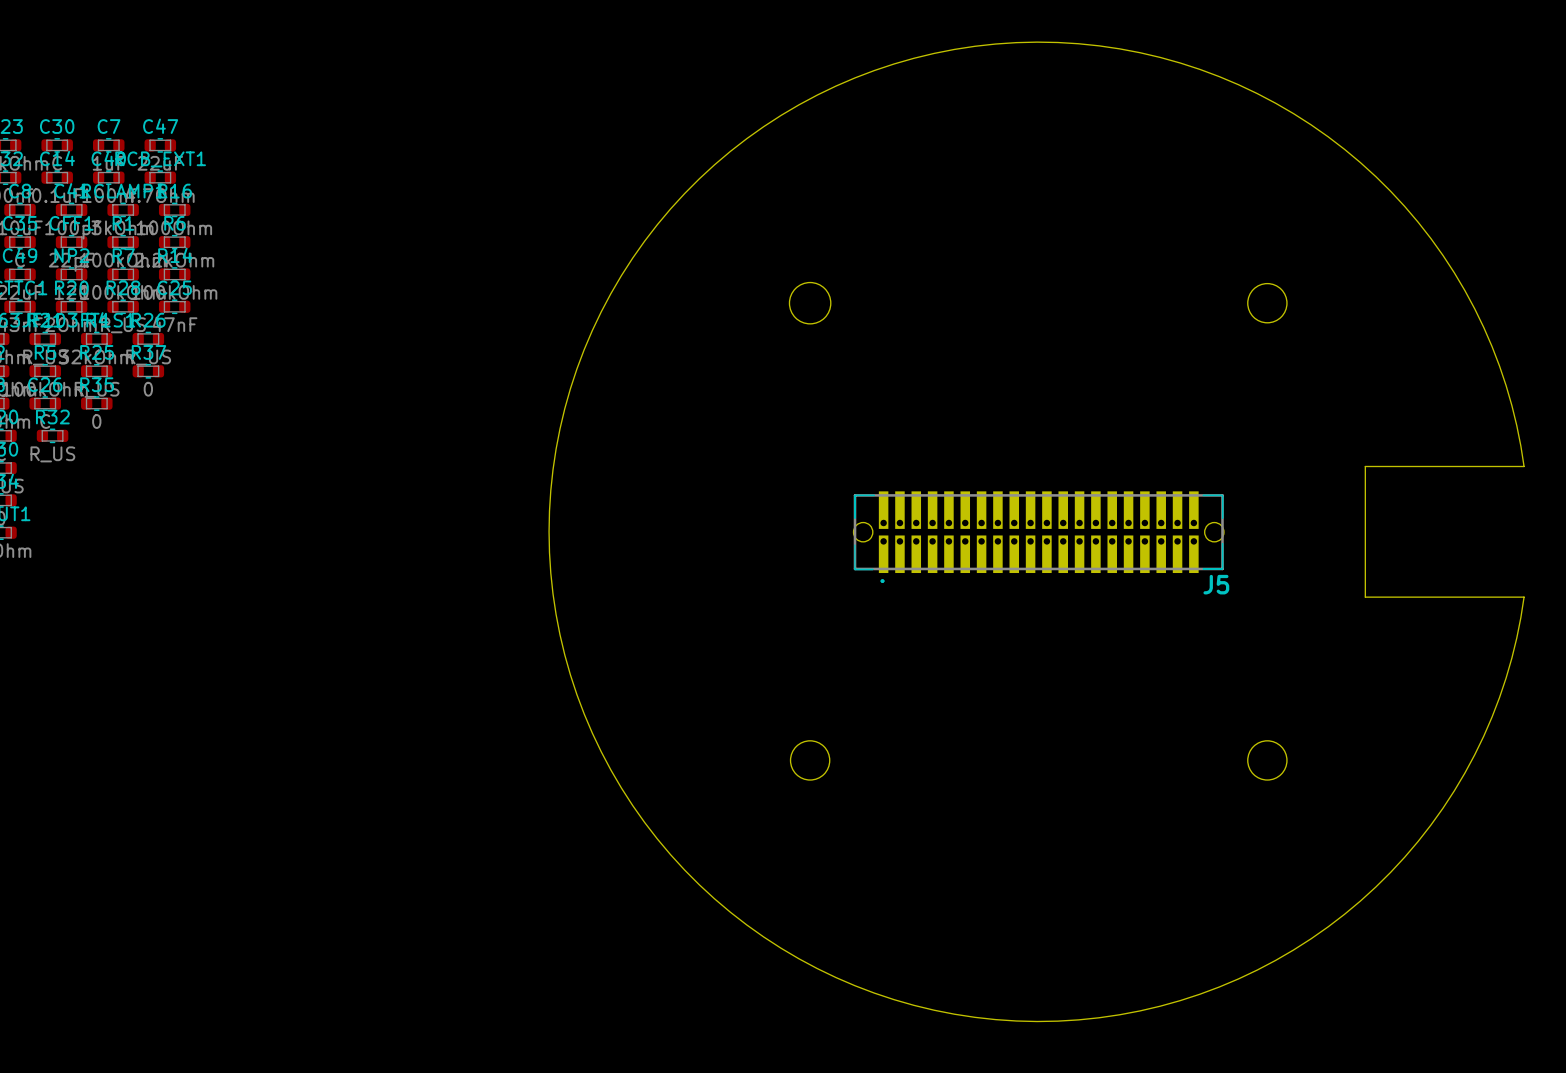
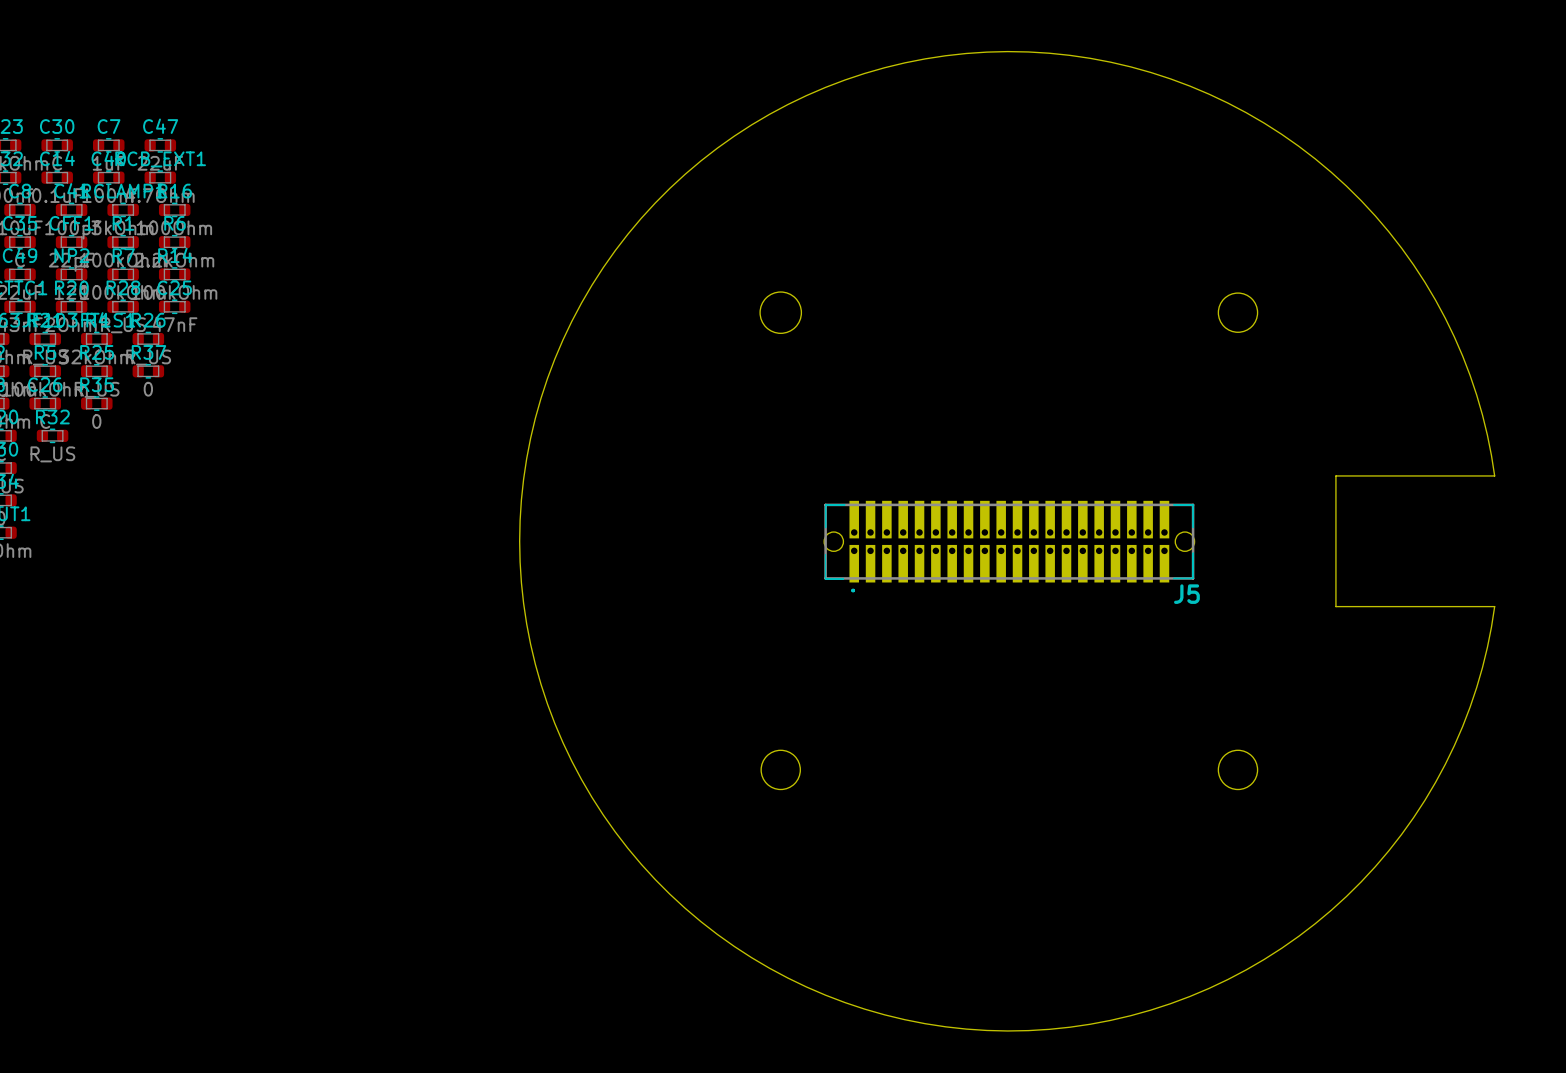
round board edge position: (810, 303) -> (780, 312)
round board edge position: (1267, 303) -> (1237, 312)
board edge: (1365, 466) (1524, 466) (1516, 425) (1506, 385) (1492, 346) (1474, 308) (1454, 272) (1430, 238) (1404, 206) (1375, 176) (1328, 136) (1275, 103) (1219, 76) (1160, 57) (1119, 48) (1057, 42) (995, 44) (934, 53) (874, 70) (835, 86) (798, 104) (763, 126) (714, 164) (684, 193) (657, 224) (621, 275) (592, 330) (576, 369) (564, 408) (556, 449) (550, 490) (549, 531) (553, 593) (560, 634) (570, 674) (592, 733) (621, 788) (644, 822) (670, 854) (714, 898) (746, 924) (781, 948) (835, 977) (874, 993) (914, 1005) (954, 1014) (995, 1019) (1037, 1021) (1078, 1019) (1140, 1010) (1180, 1000) (1238, 978) (1293, 949) (1344, 914) (1390, 872) (1430, 825) (1464, 773) (1492, 717) (1511, 658) (1524, 597) (1365, 597) (1365, 466) -> (1335, 475) (1494, 475) (1487, 435) (1476, 395) (1462, 356) (1445, 318) (1424, 282) (1401, 248) (1375, 215) (1346, 186) (1298, 146) (1246, 112) (1190, 86) (1130, 66) (1090, 58) (1028, 51) (966, 53) (904, 62) (845, 79) (806, 95) (769, 114) (734, 136) (685, 174) (655, 203) (627, 234) (592, 285) (562, 339) (547, 378) (535, 418) (526, 458) (521, 499) (519, 541) (523, 603) (530, 644) (541, 684) (562, 742) (592, 797) (615, 831) (641, 864) (685, 908) (717, 934) (751, 957) (806, 987) (845, 1002) (884, 1014) (925, 1023) (966, 1029) (1028, 1030) (1069, 1027) (1110, 1020) (1170, 1003) (1227, 979) (1281, 948) (1331, 910) (1375, 866) (1413, 817) (1435, 782) (1462, 726) (1482, 667) (1494, 606) (1335, 606) (1335, 475)
J5 position: (1038, 537) -> (1009, 546)
round board edge position: (810, 760) -> (780, 769)
round board edge position: (1267, 760) -> (1237, 769)

